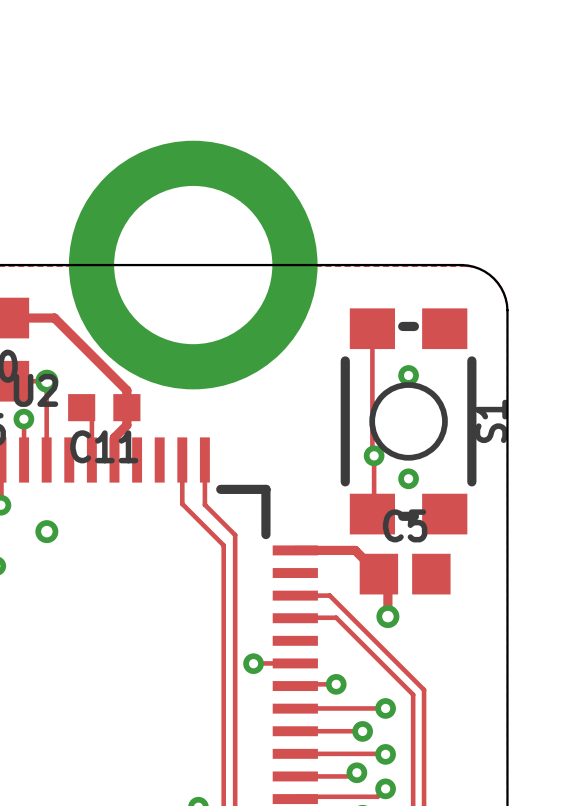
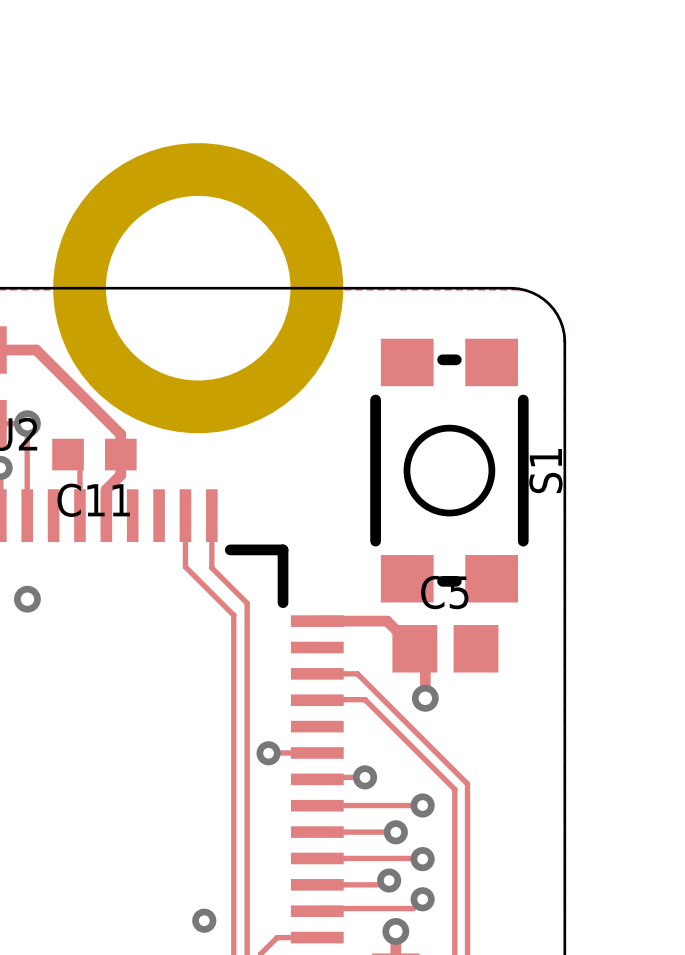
track: (372, 328) (372, 454) (374, 455) (374, 512) (372, 514) -> none
via: (408, 375) -> none
via: (374, 455) -> none
via: (408, 478) -> none

